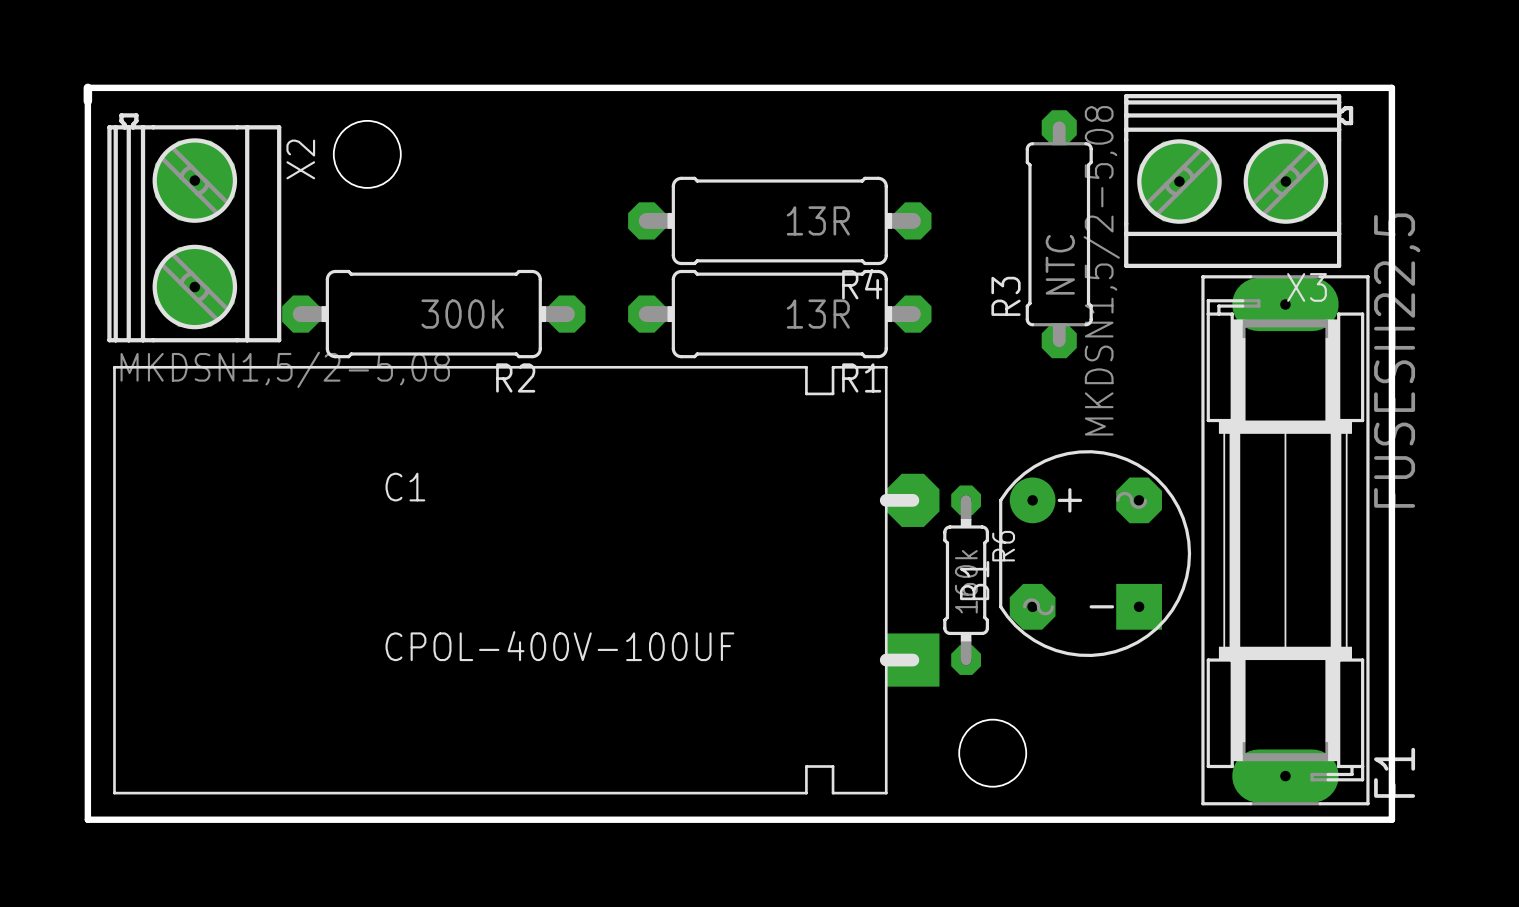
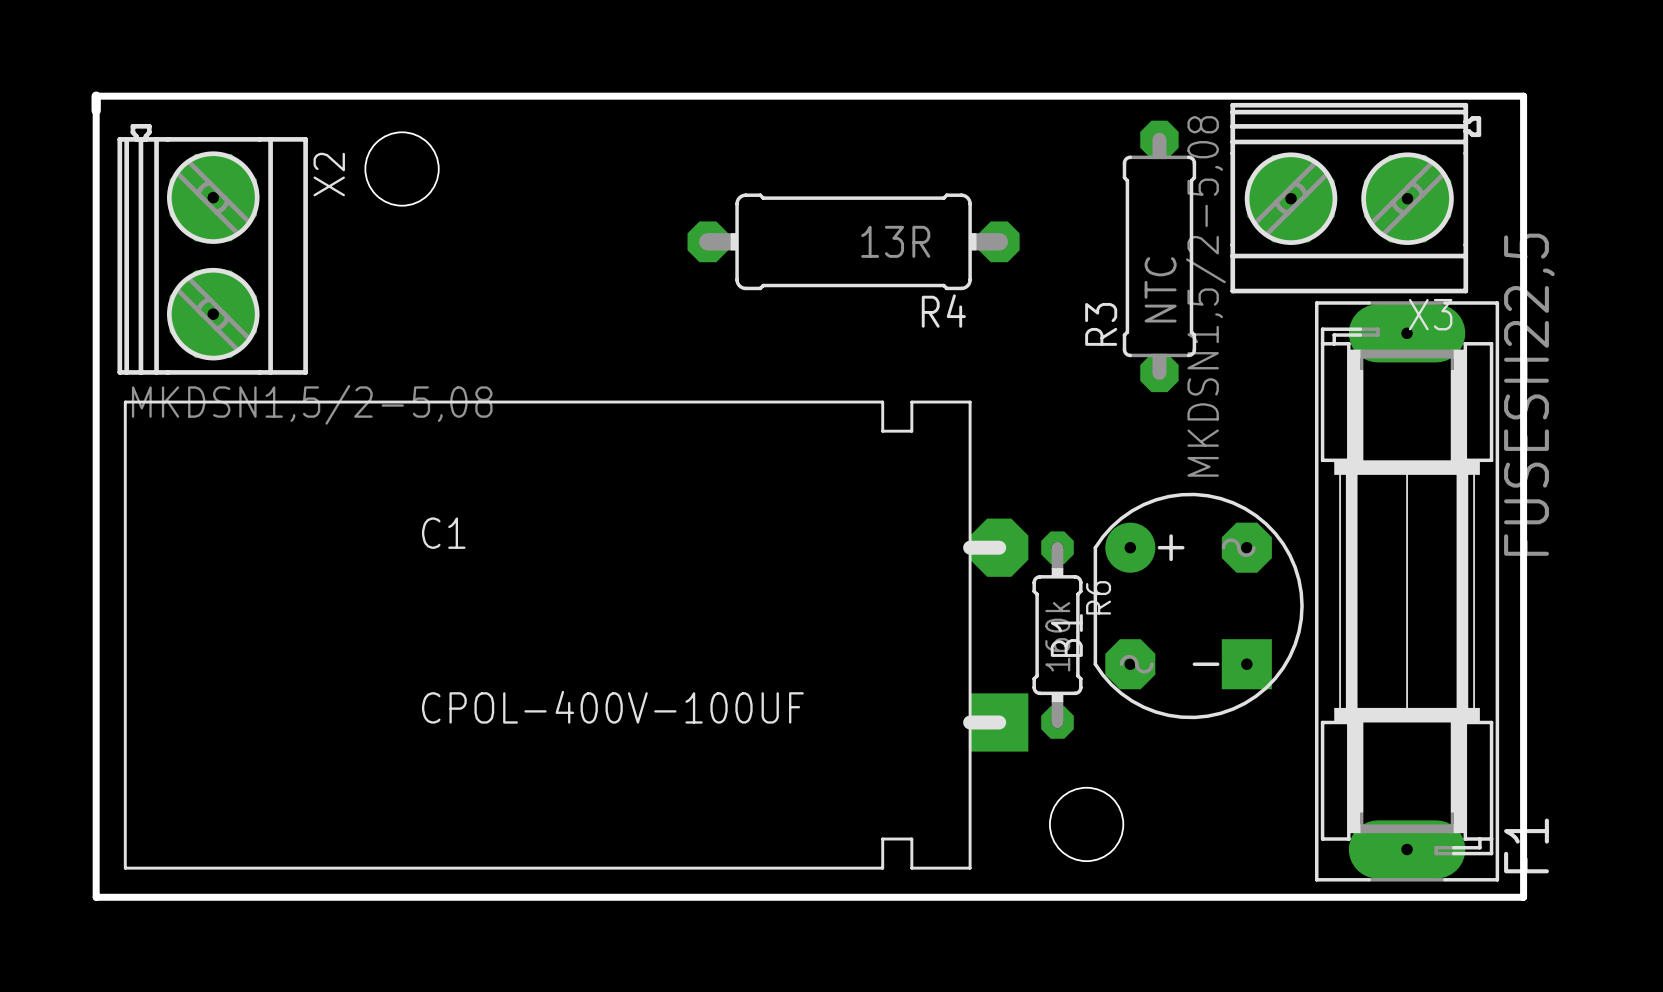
R2: 300k (433, 314) -> none
R1: 13R (779, 314) -> none

